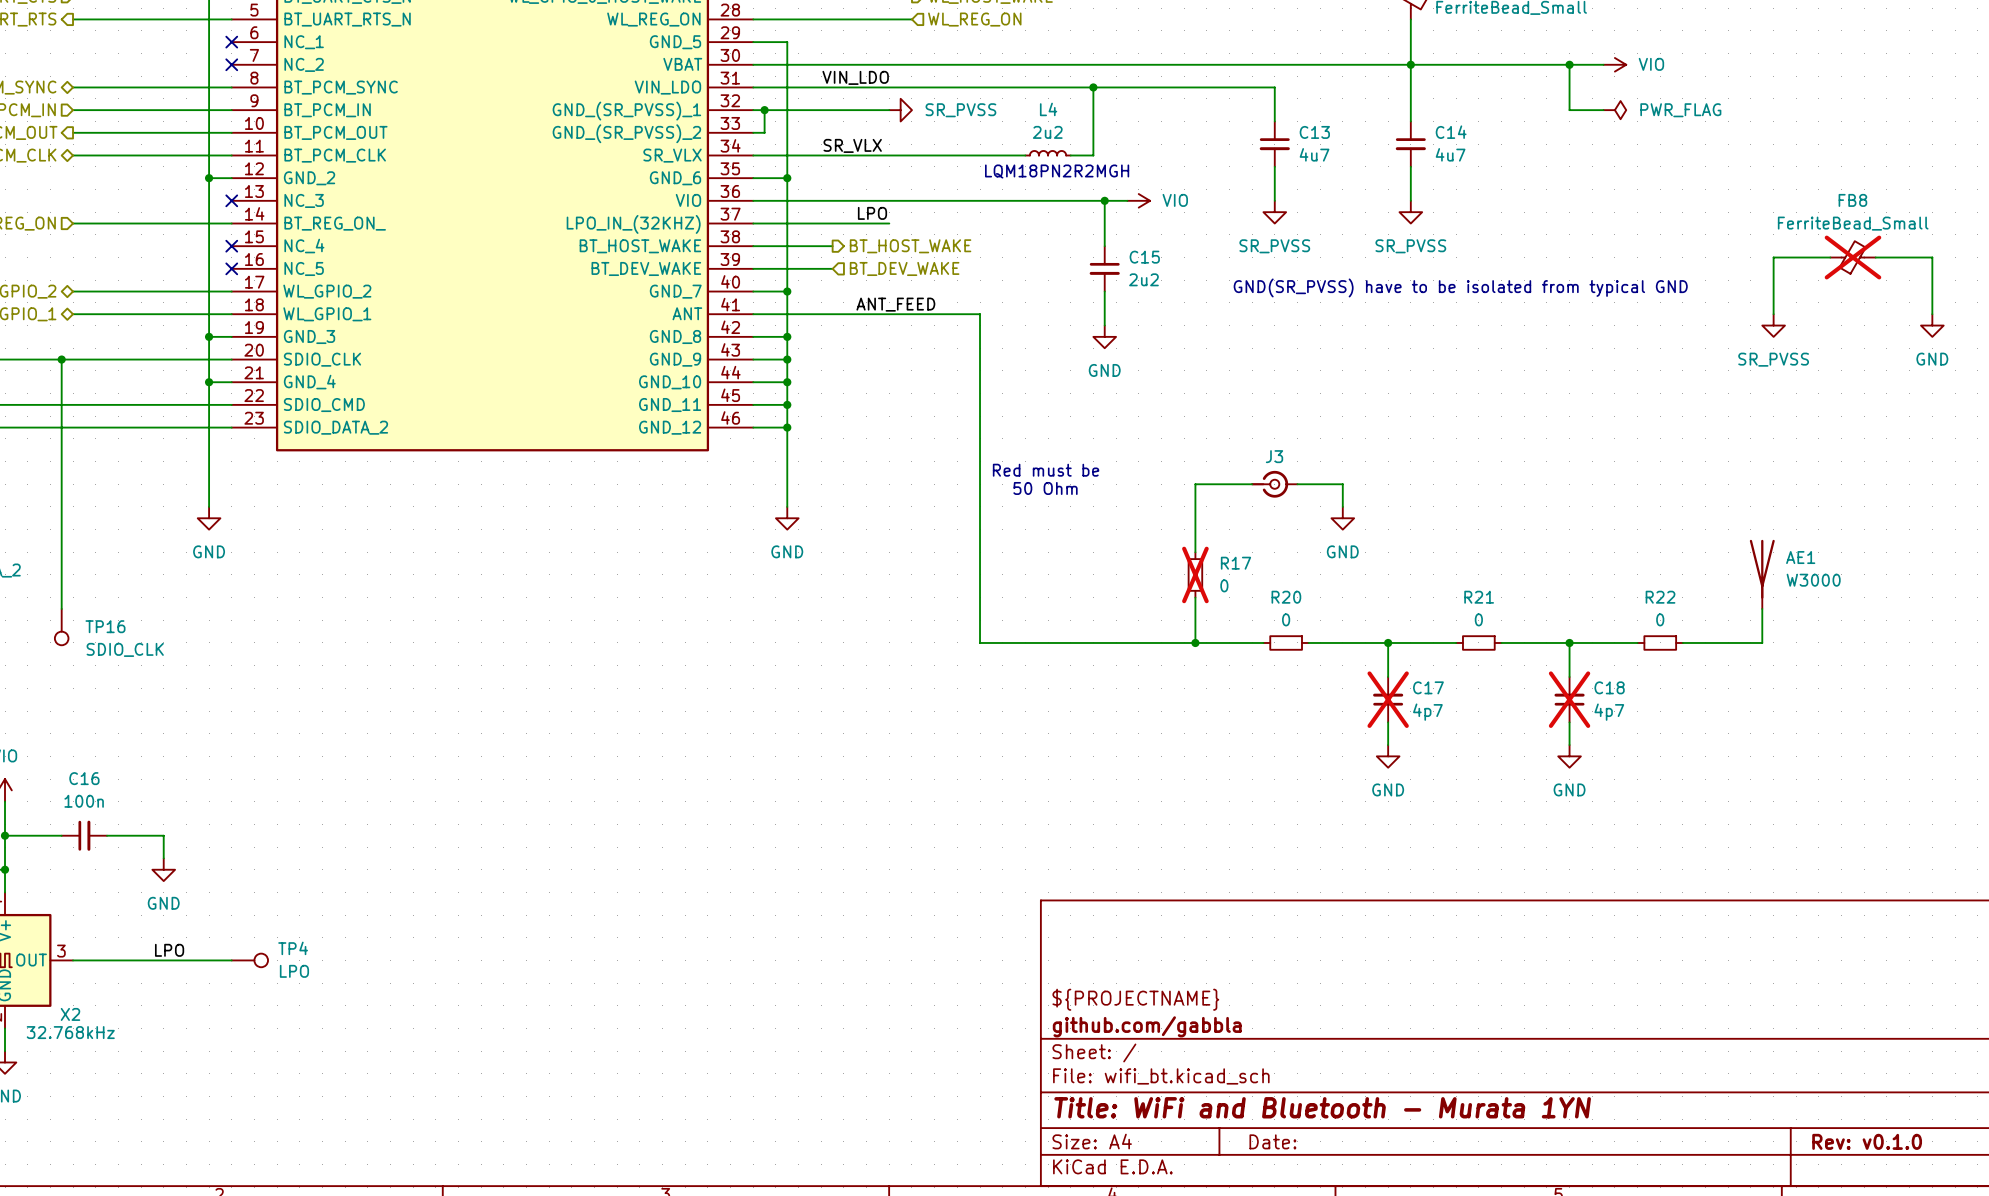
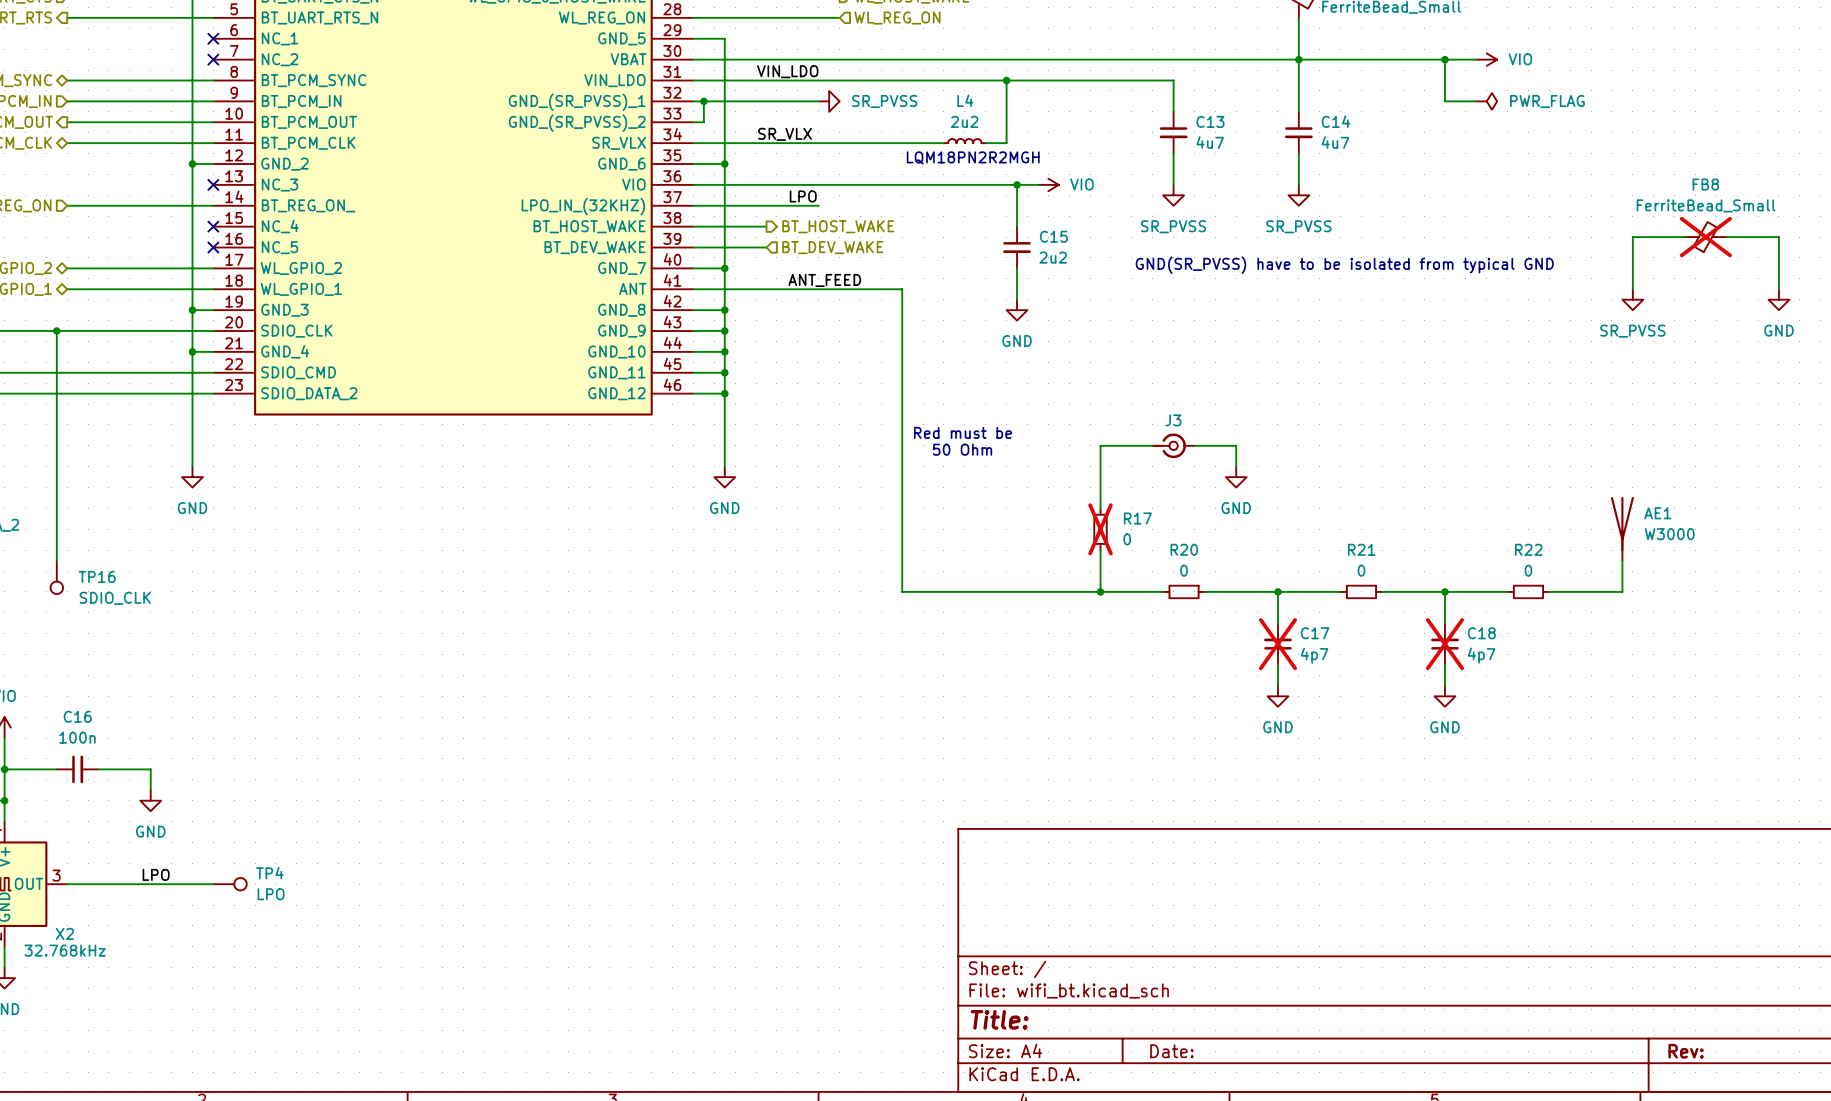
title block: ${PROJECTNAME} (1135, 999) -> none
title block: github.com/gabbla (1147, 1026) -> none
title block: Title: WiFi and Bluetooth - Murata 1YN (1322, 1107) -> Title: (999, 1019)
title block: Rev: v0.1.0 (1867, 1141) -> Rev: (1686, 1051)

